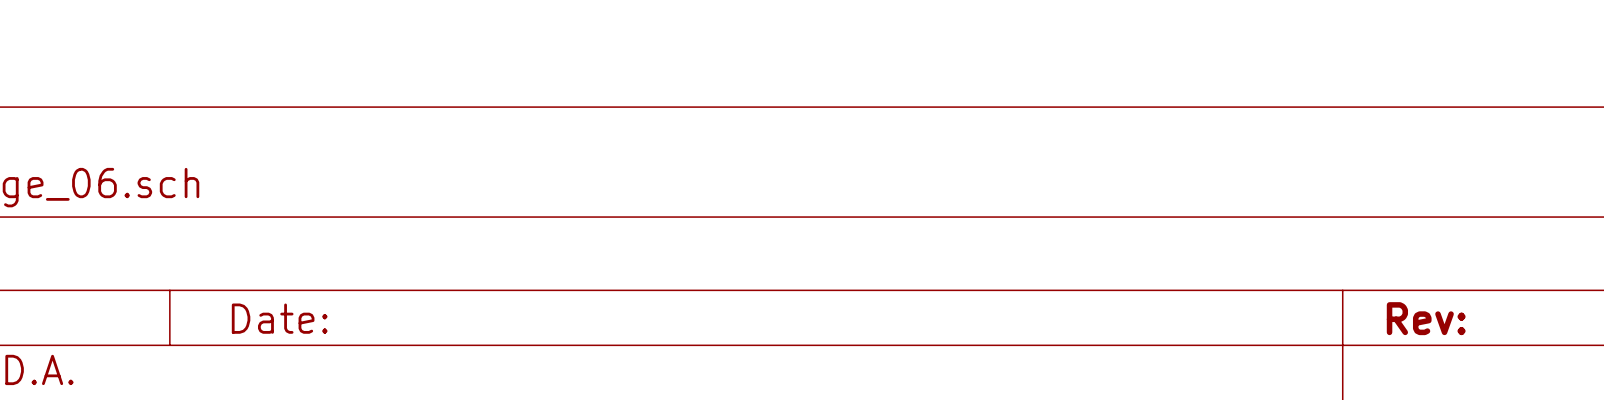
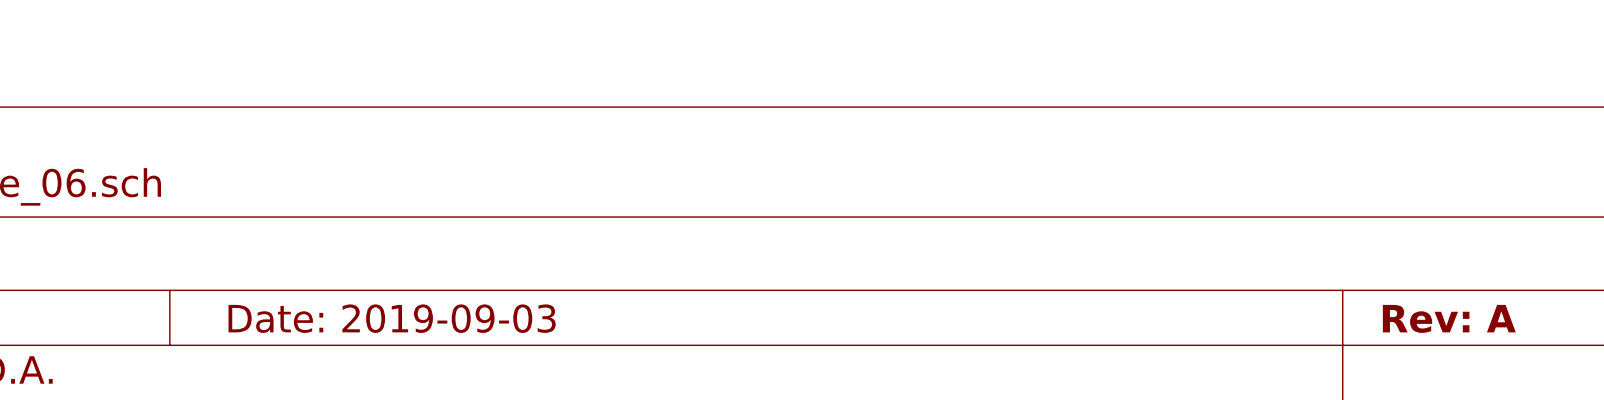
title block: Date: (279, 318) -> Date: 2019-09-03 (392, 318)
title block: Rev: (1426, 318) -> Rev: A (1449, 318)

